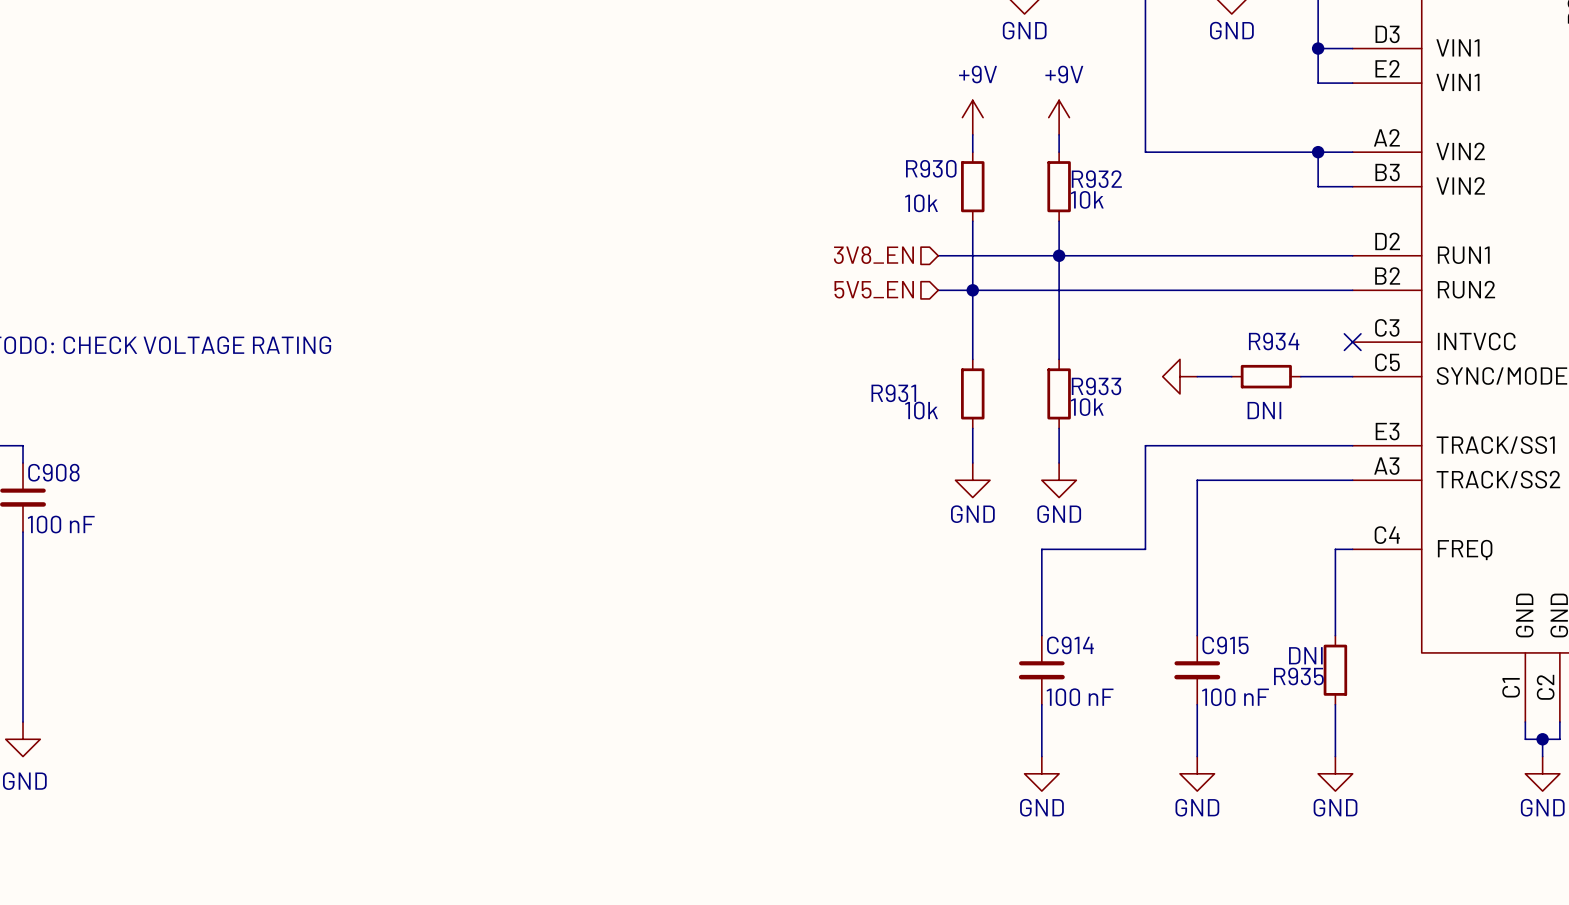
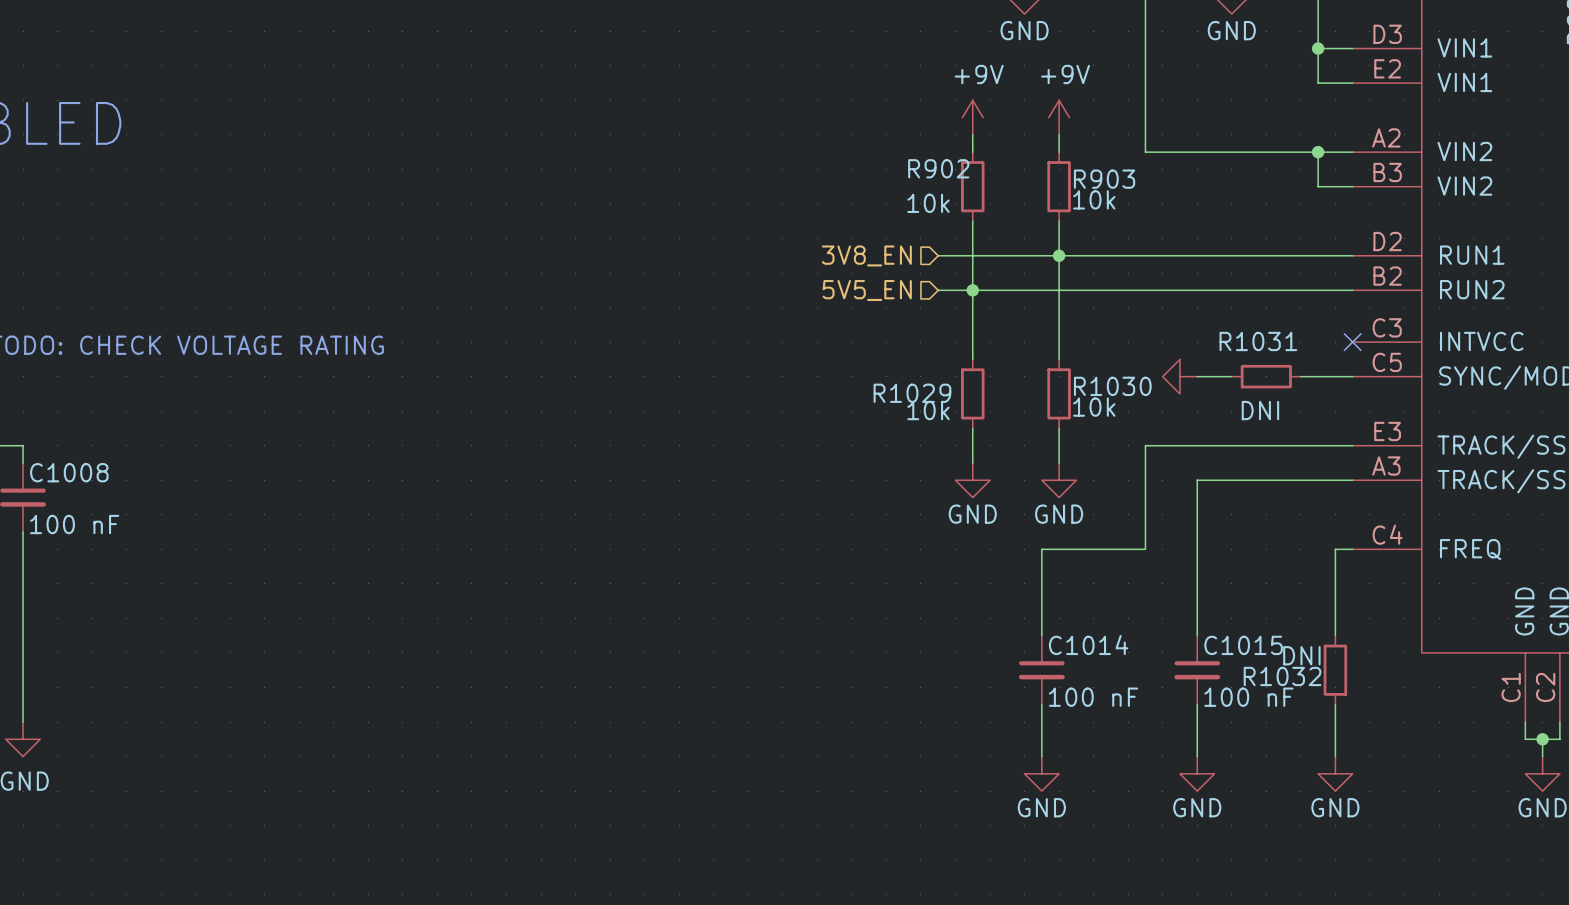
R930 name: R930 (931, 168) -> R902 (938, 168)
R932 name: R932 (1096, 179) -> R903 (1104, 179)
R934 name: R934 (1274, 341) -> R1031 (1258, 341)
R933 name: R933 (1096, 386) -> R1030 (1112, 386)
R931 name: R931 (893, 393) -> R1029 (912, 393)
C908 name: C908 (53, 472) -> C1008 (69, 472)
C914 name: C914 (1070, 645) -> C1014 (1088, 644)
C915 name: C915 (1225, 645) -> C1015 (1243, 645)
R935 name: R935 (1298, 676) -> R1032 (1282, 676)

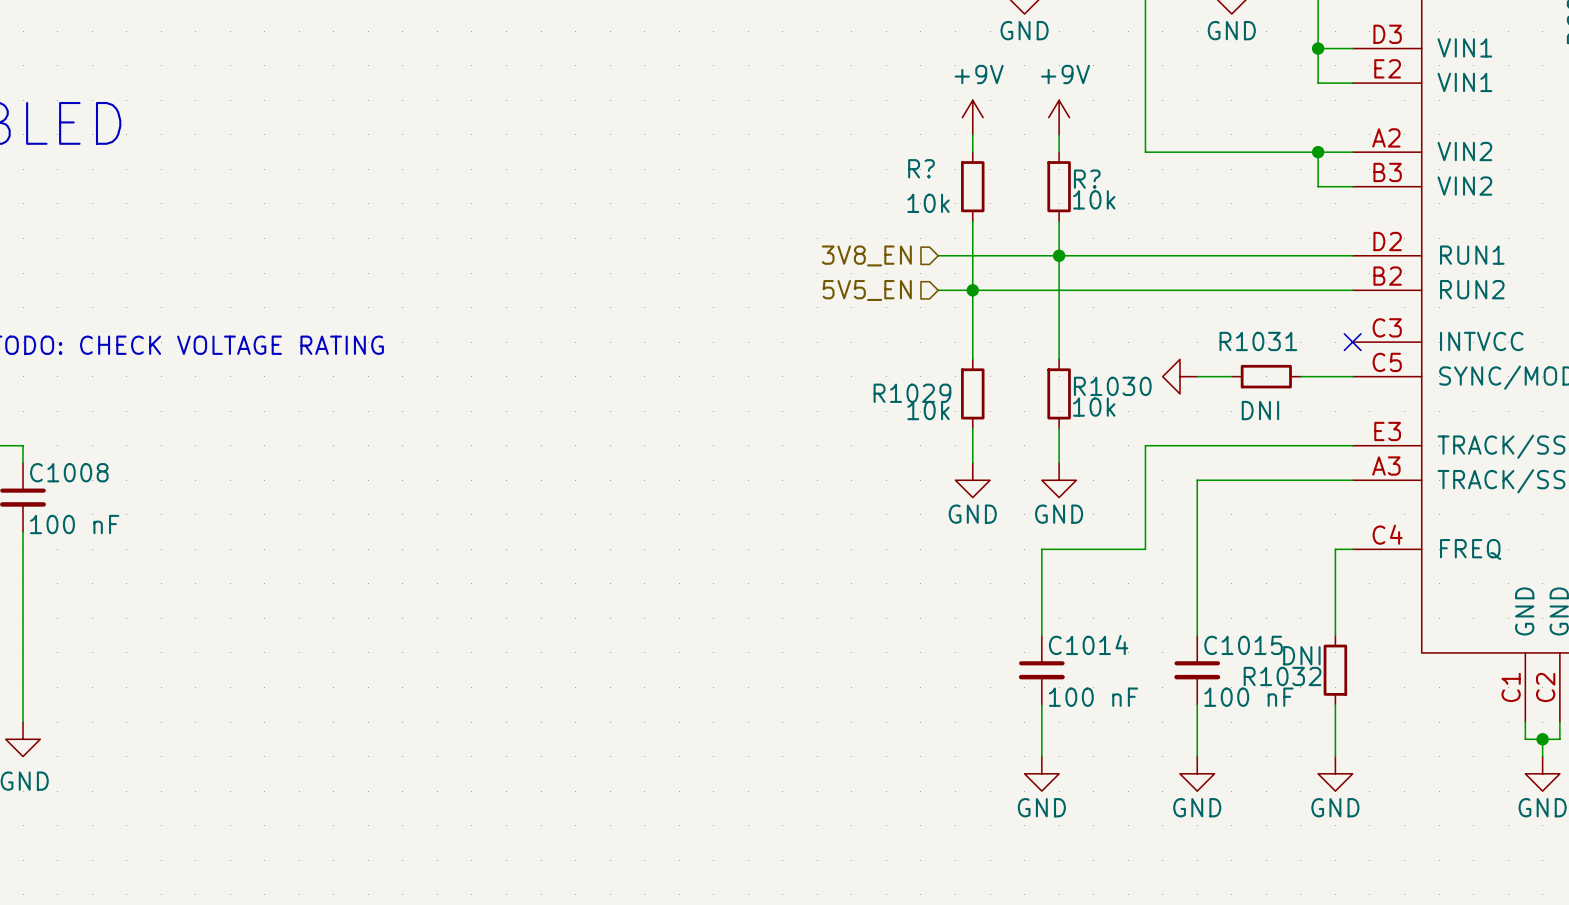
R902 name: R902 (938, 168) -> R? (921, 168)
R903 name: R903 (1104, 179) -> R? (1087, 179)

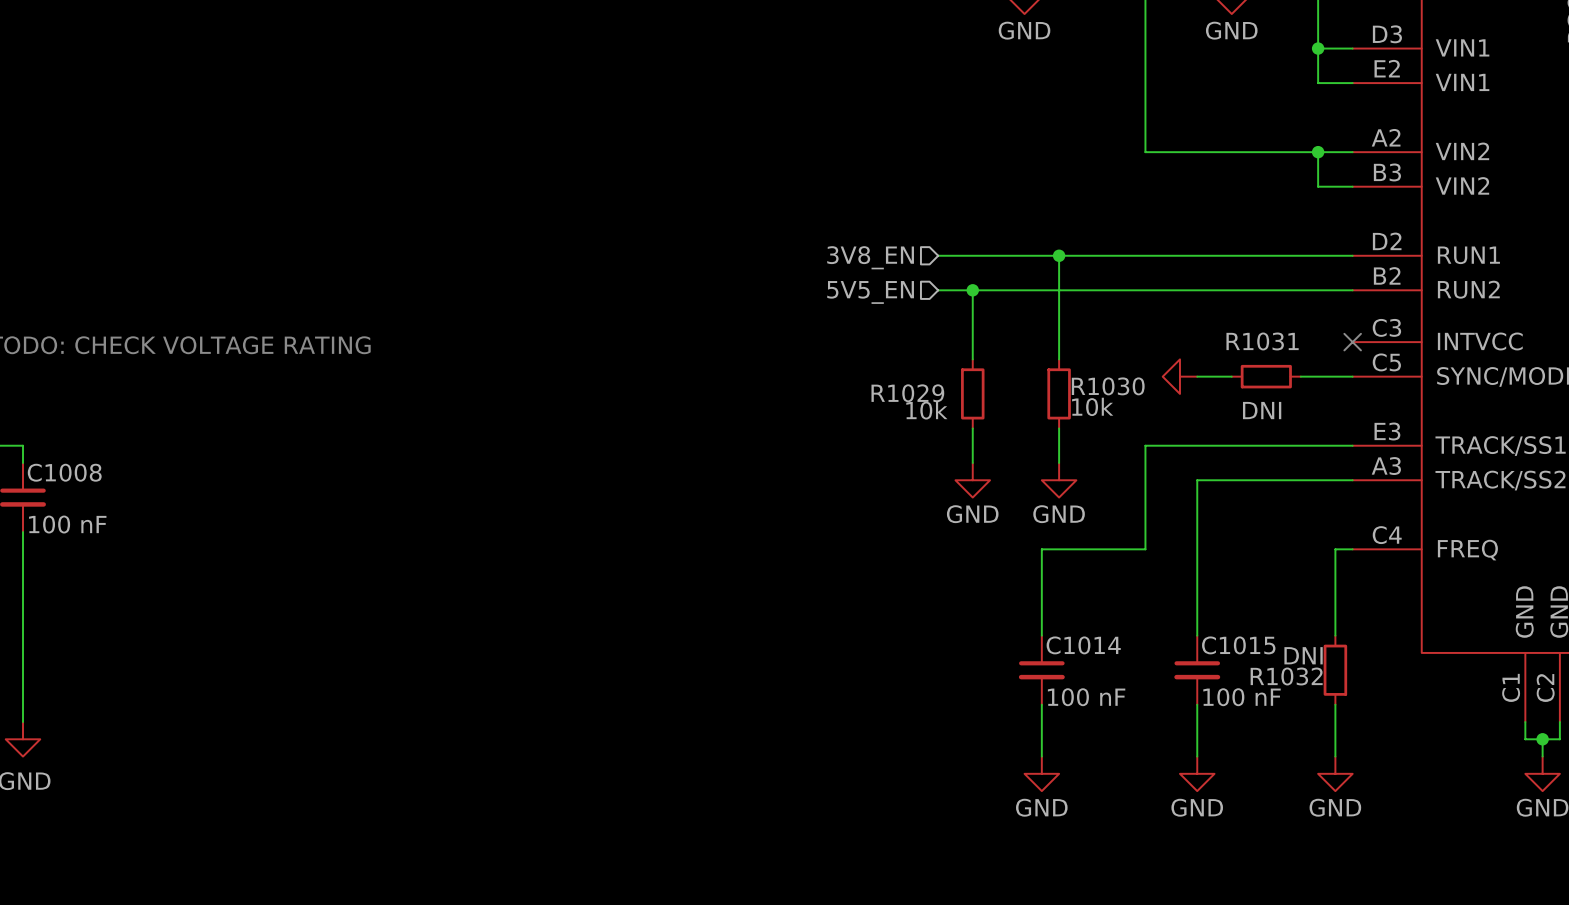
power symbol: +9V (972, 117) -> none
power symbol: +9V (1059, 117) -> none
wire: (972, 134) (972, 152) -> none
wire: (1059, 134) (1059, 152) -> none
R?: 10k (972, 186) -> none
R?: 10k (1059, 186) -> none
wire: (972, 221) (972, 290) -> none
wire: (1059, 221) (1059, 255) -> none

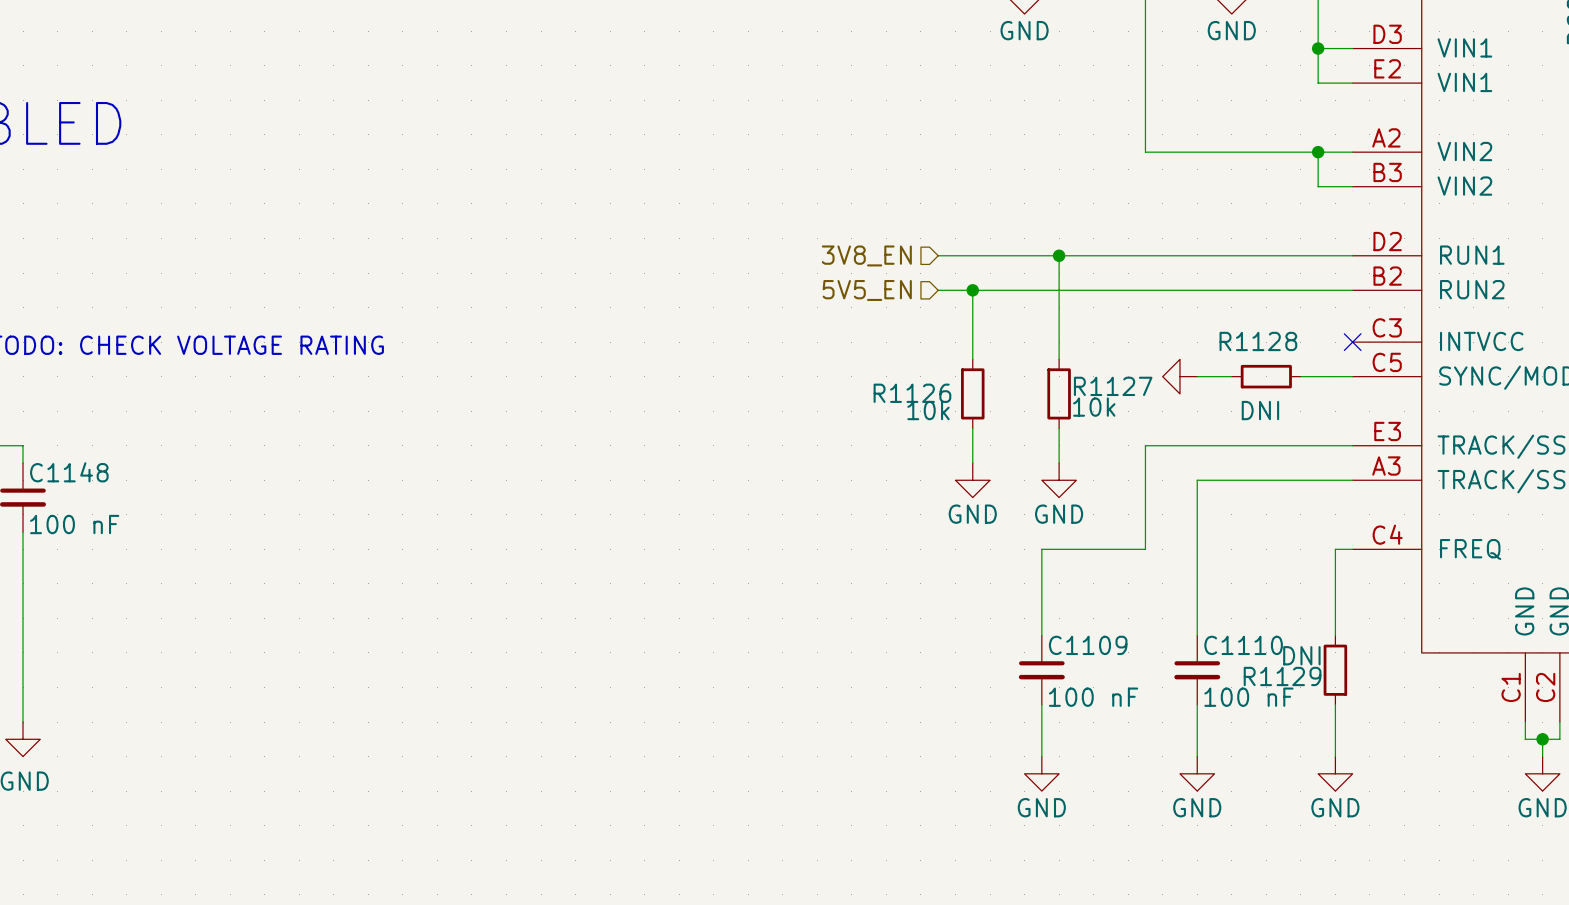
R1031 name: R1031 (1262, 341) -> R1128 (1258, 341)
R1030 name: R1030 (1108, 386) -> R1127 (1113, 386)
R1029 name: R1029 (907, 393) -> R1126 (912, 393)
C1008 name: C1008 (64, 472) -> C1148 (69, 472)
C1014 name: C1014 (1083, 645) -> C1109 (1088, 645)
C1015 name: C1015 (1238, 645) -> C1110 (1243, 645)
R1032 name: R1032 (1286, 676) -> R1129 (1282, 676)

